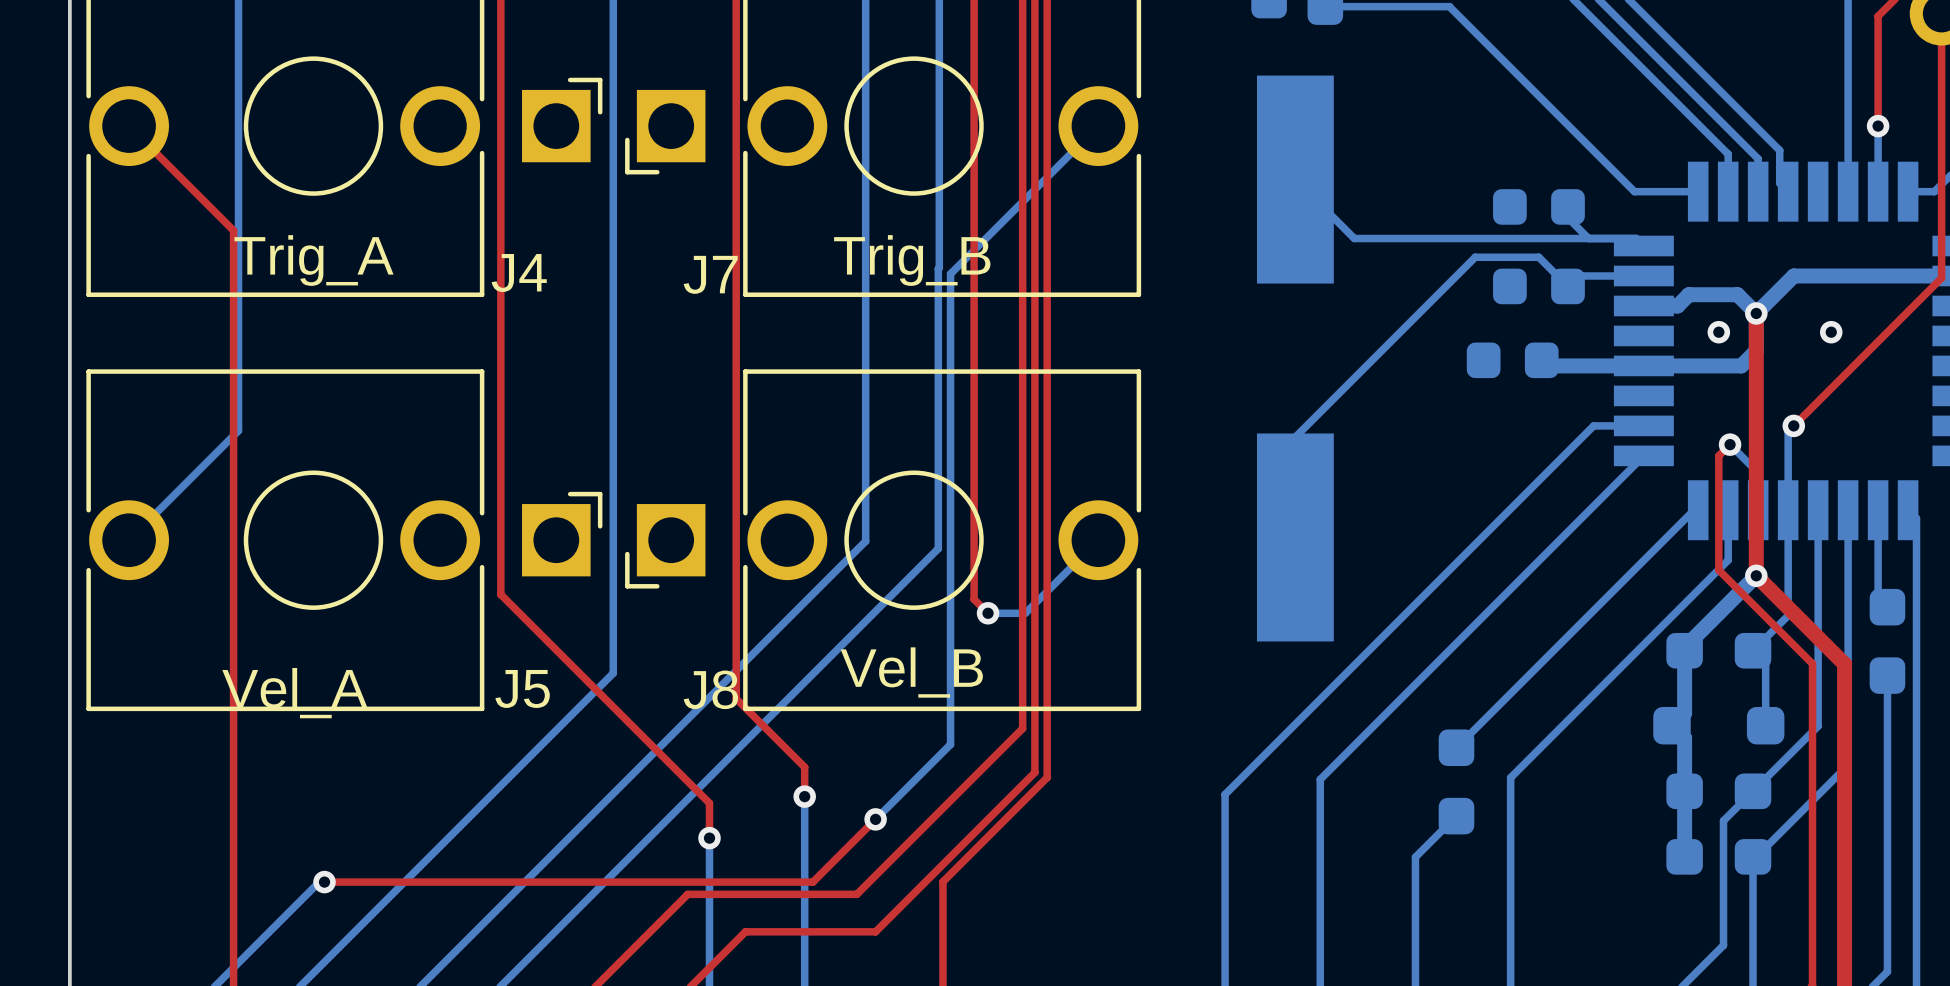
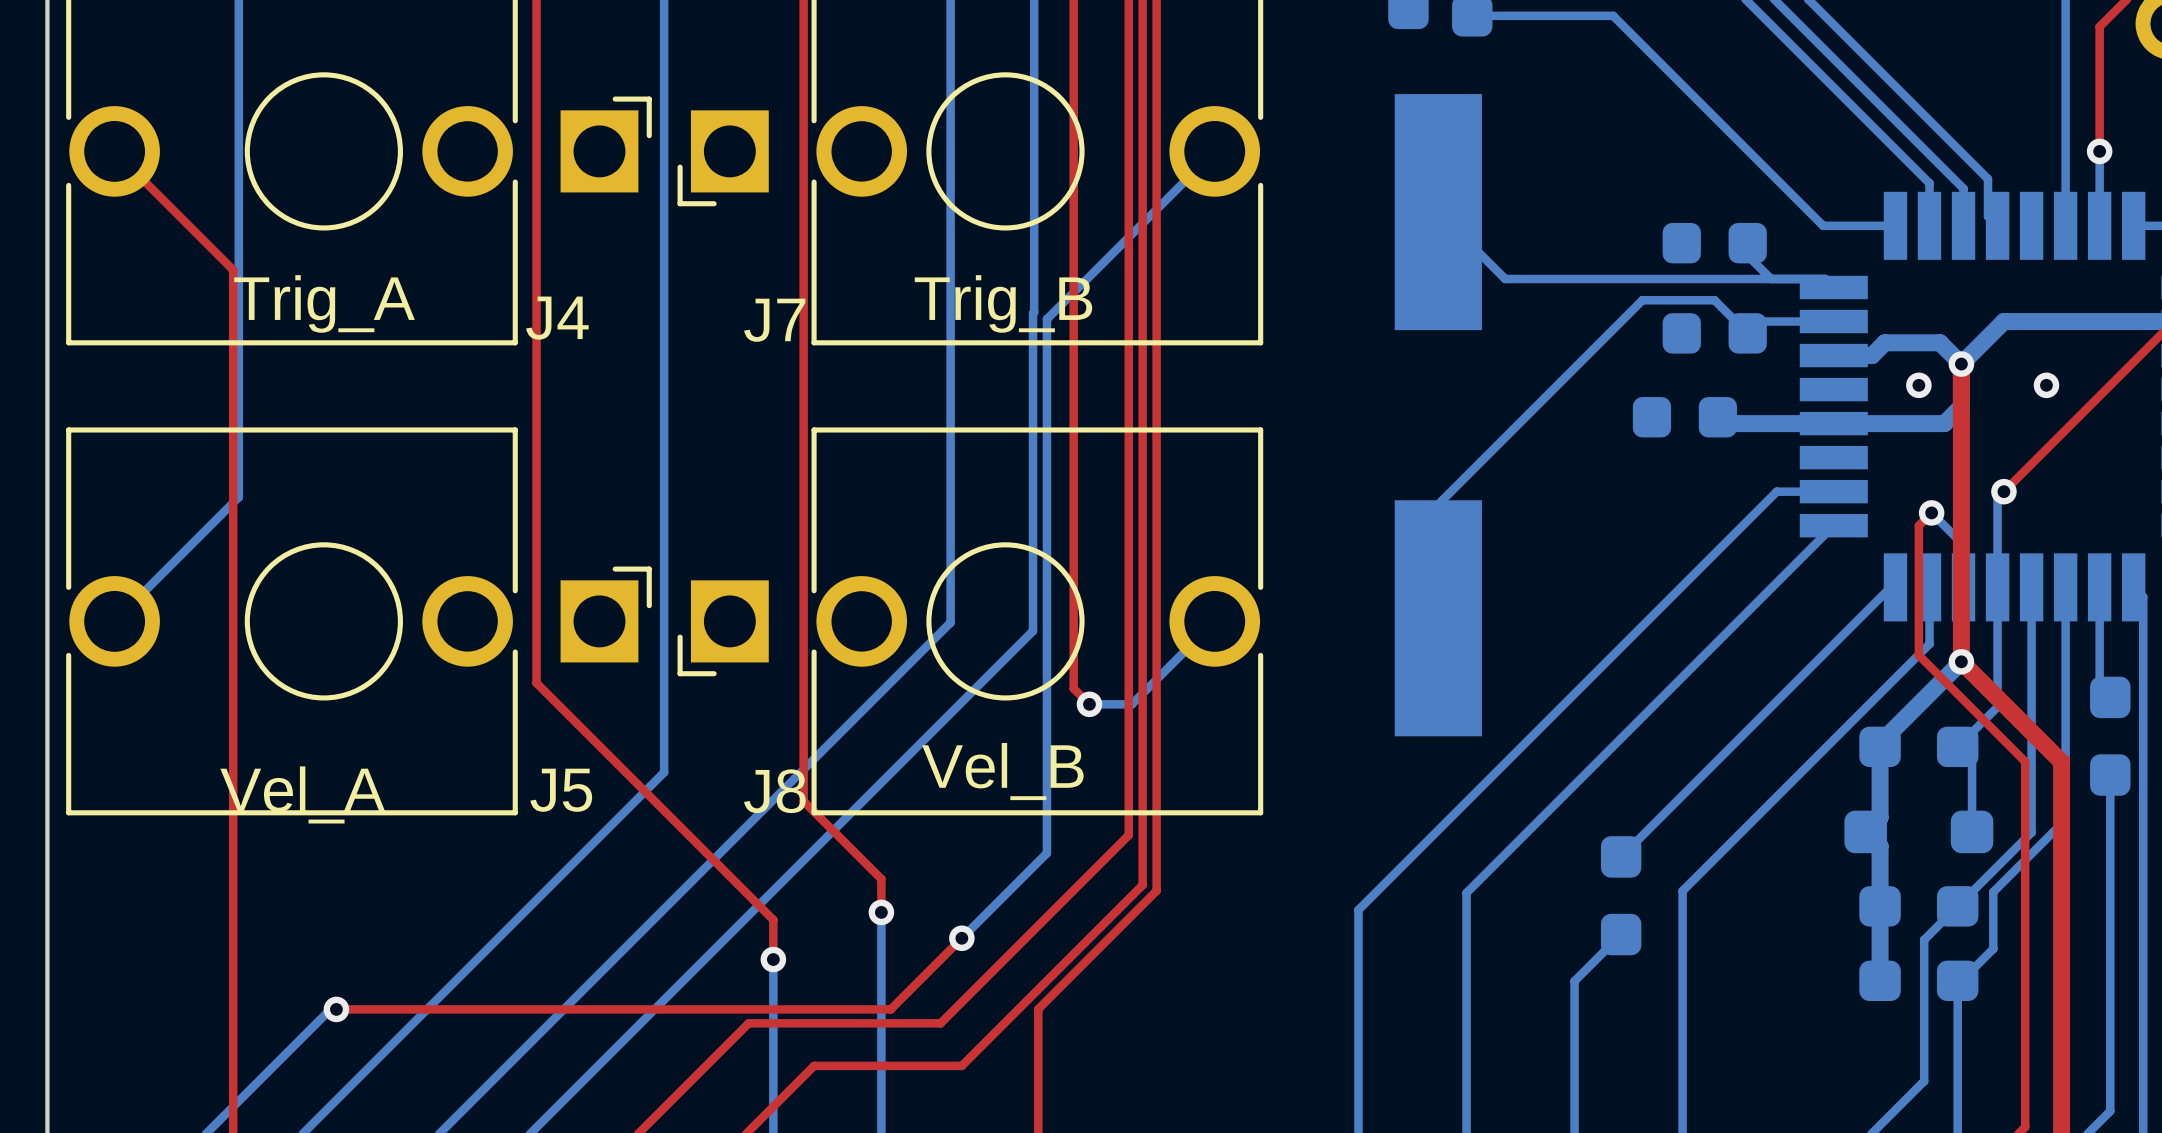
bottom track: (1848, 714) (1848, 765) (1784, 828) -> (2065, 819) (1993, 892) (1993, 948)

